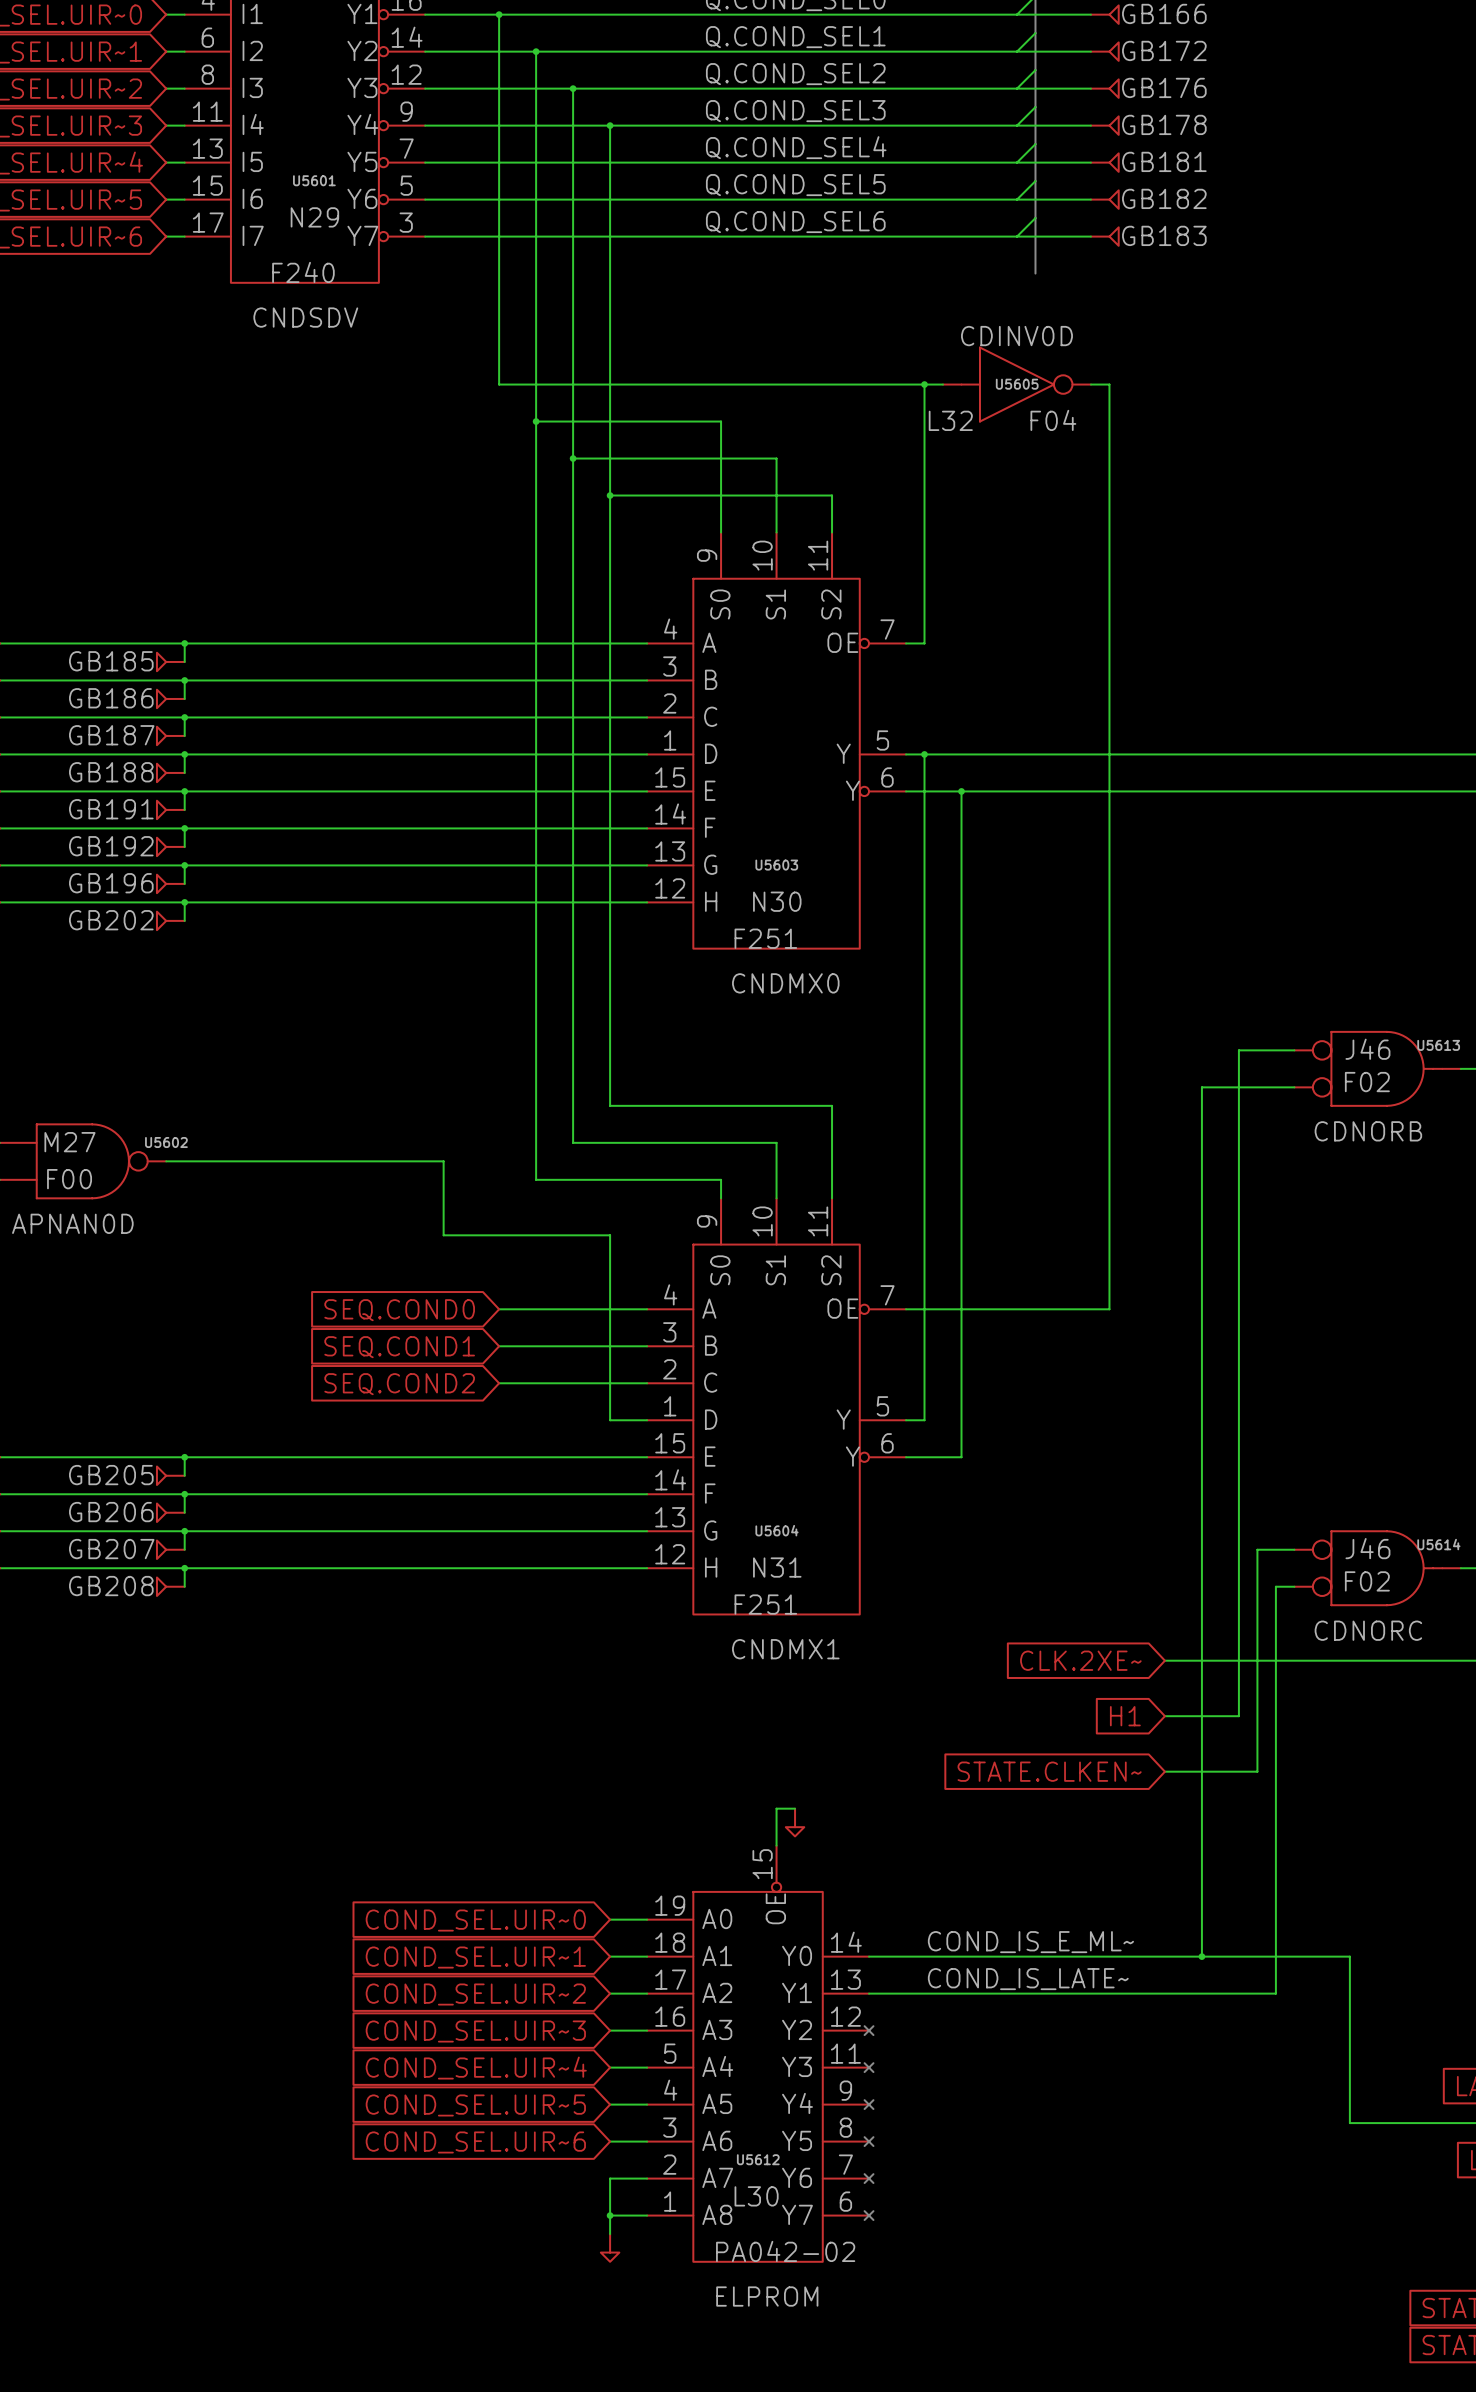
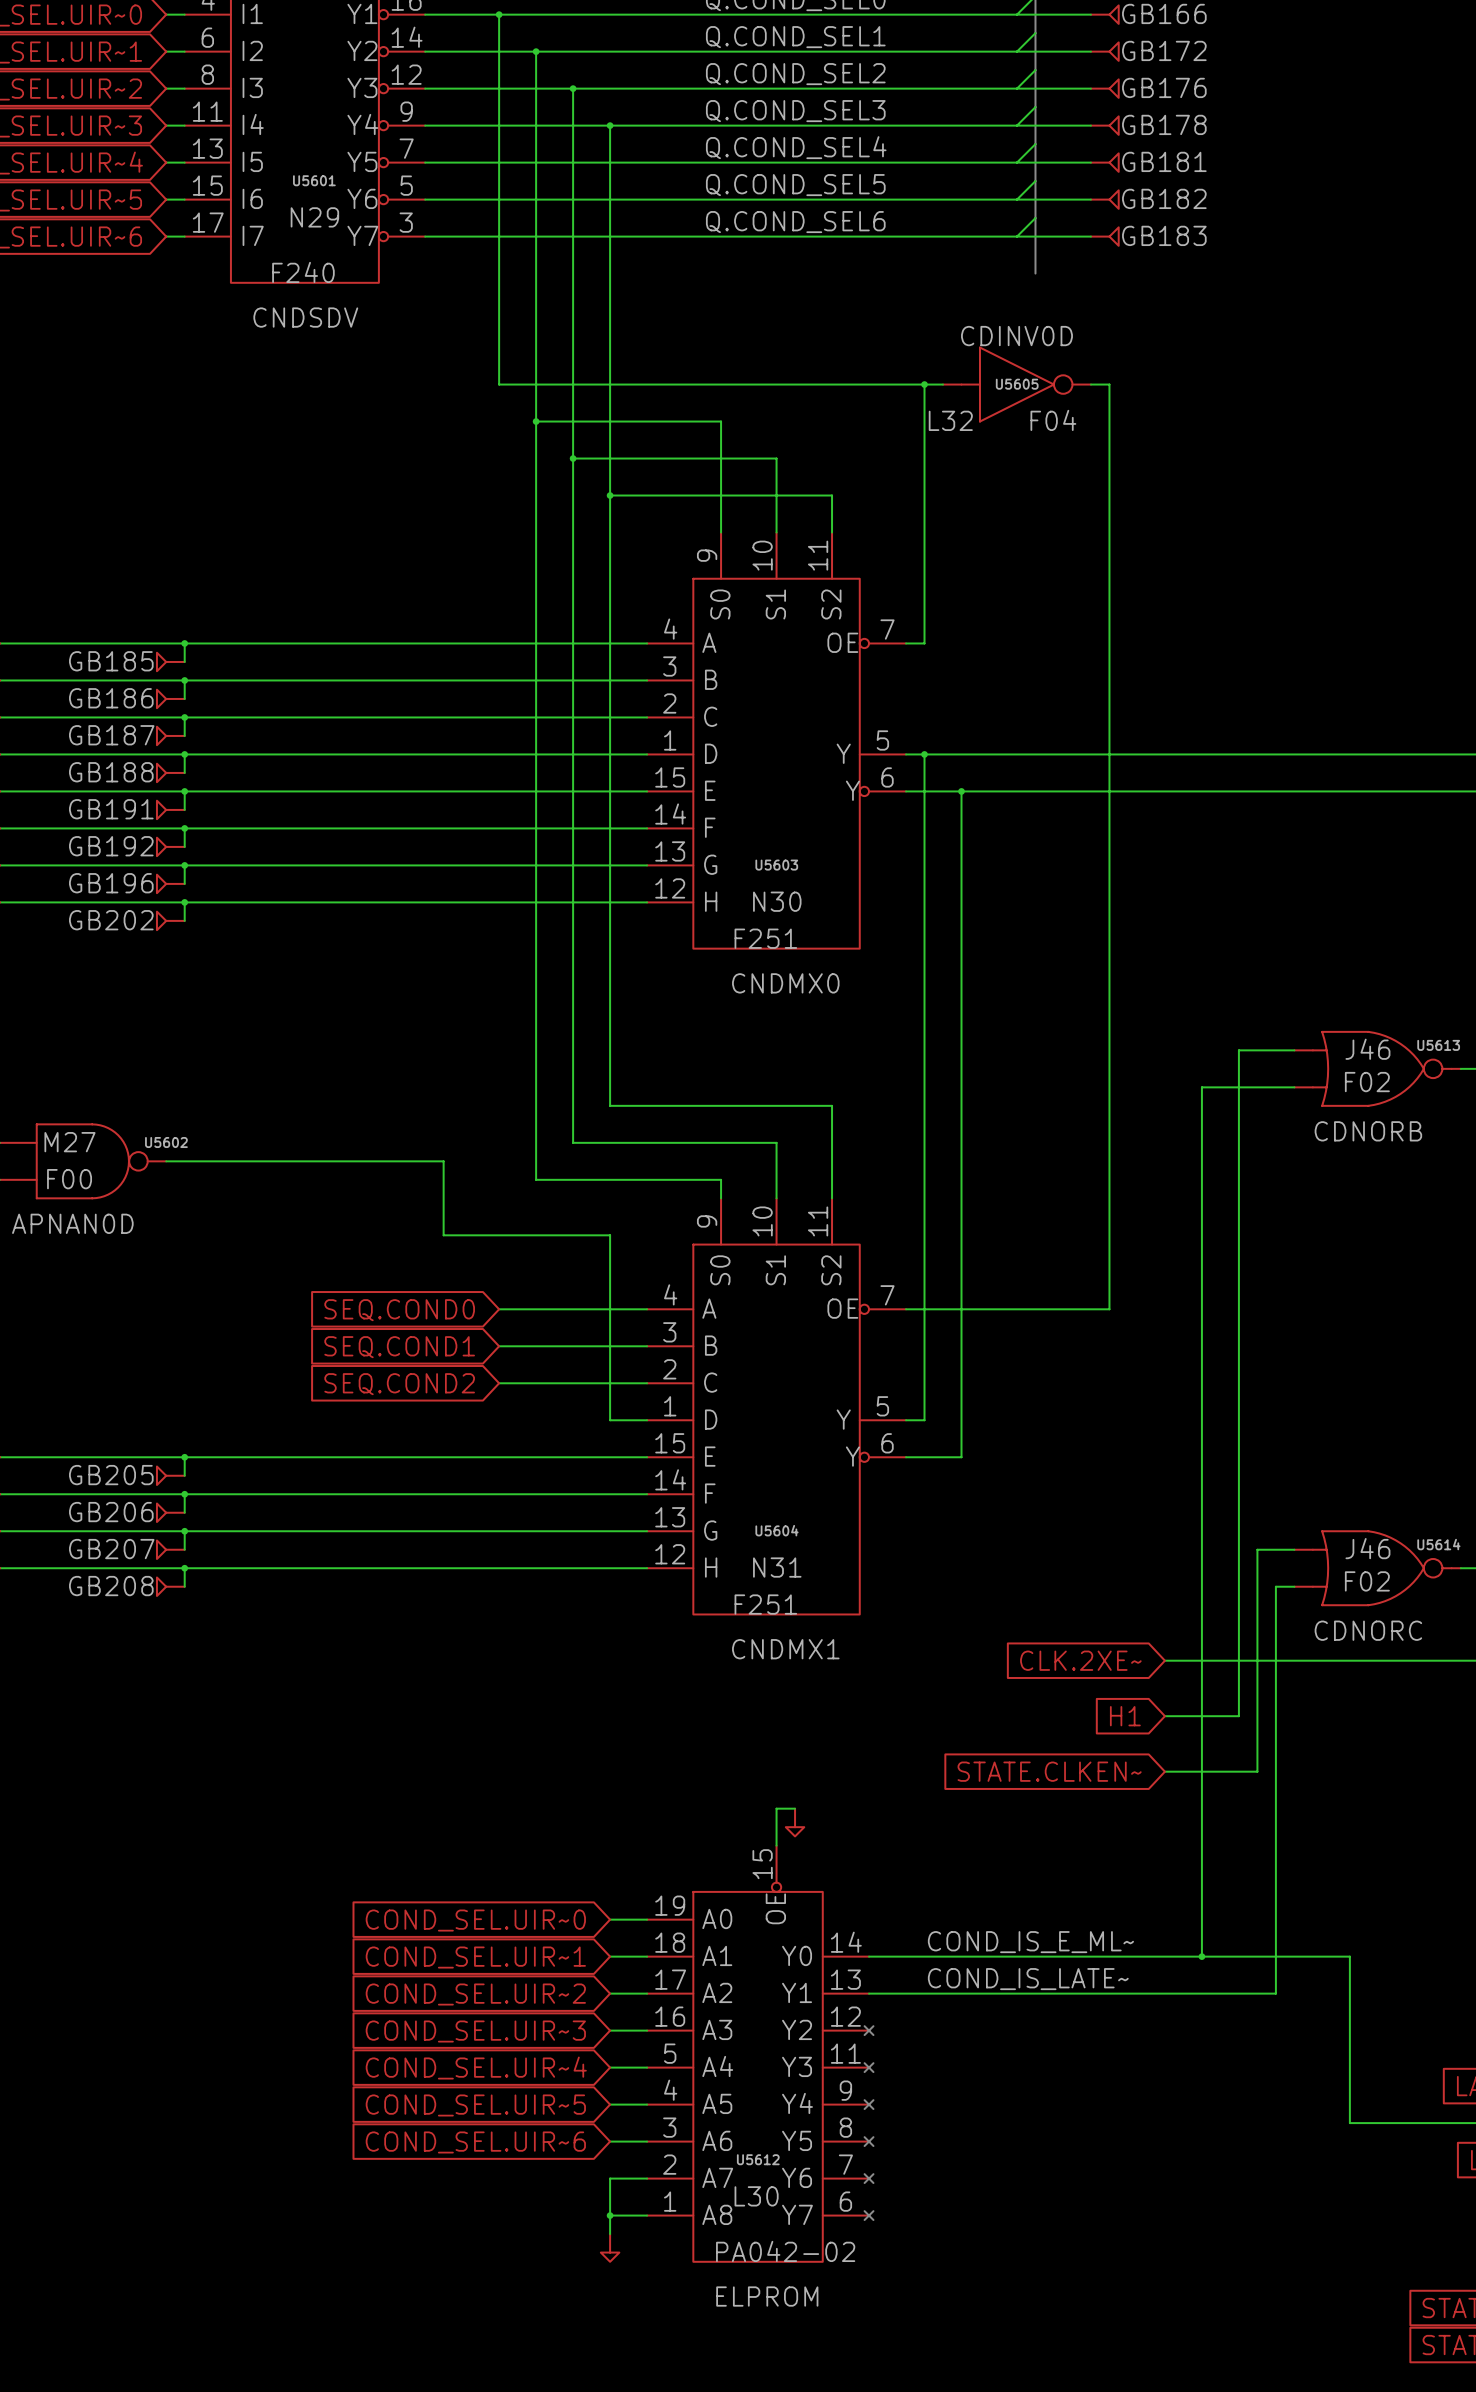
U5613 symbol: [1294, 1031, 1461, 1107] -> [1294, 1031, 1461, 1107]
U5614 symbol: [1294, 1530, 1461, 1606] -> [1294, 1530, 1461, 1606]

